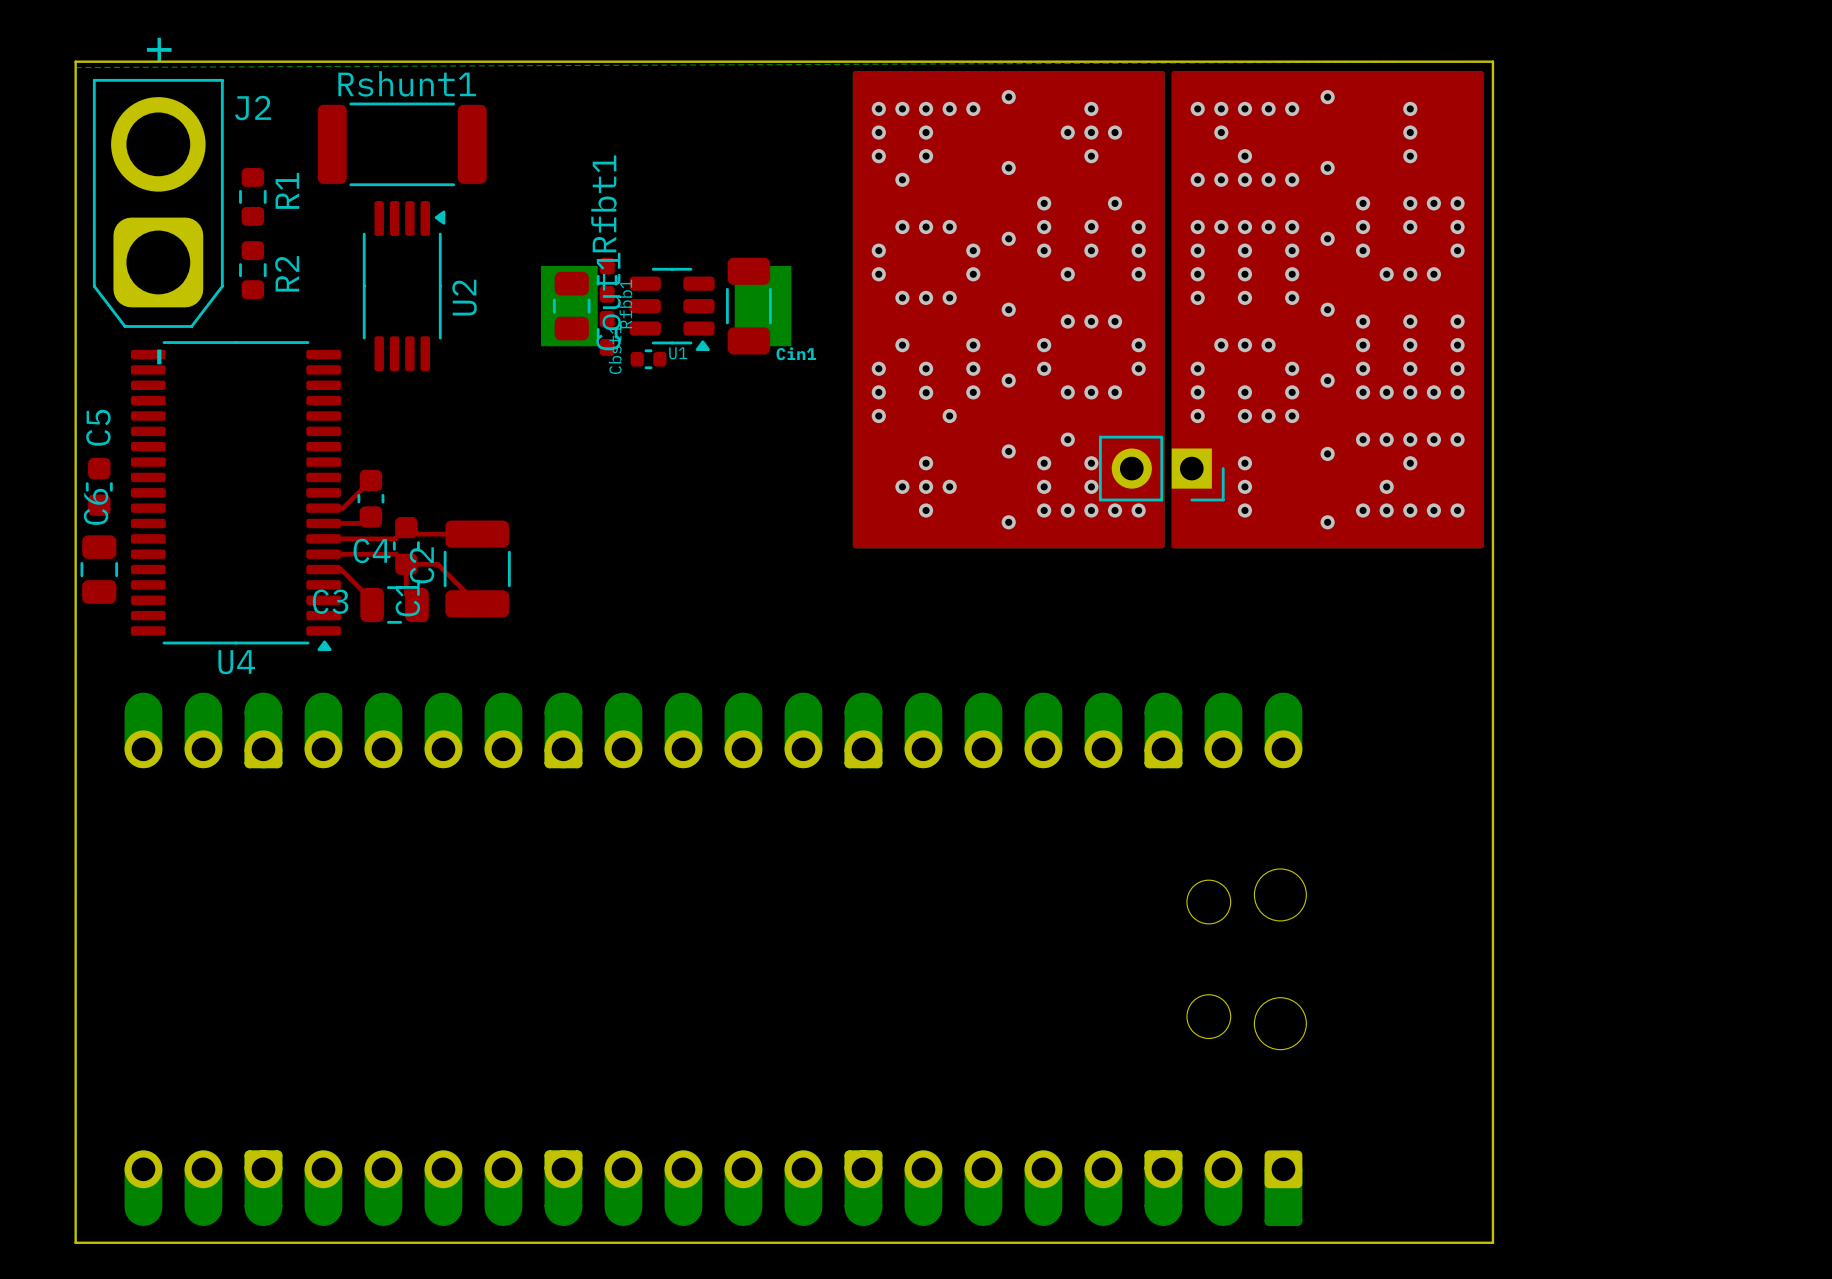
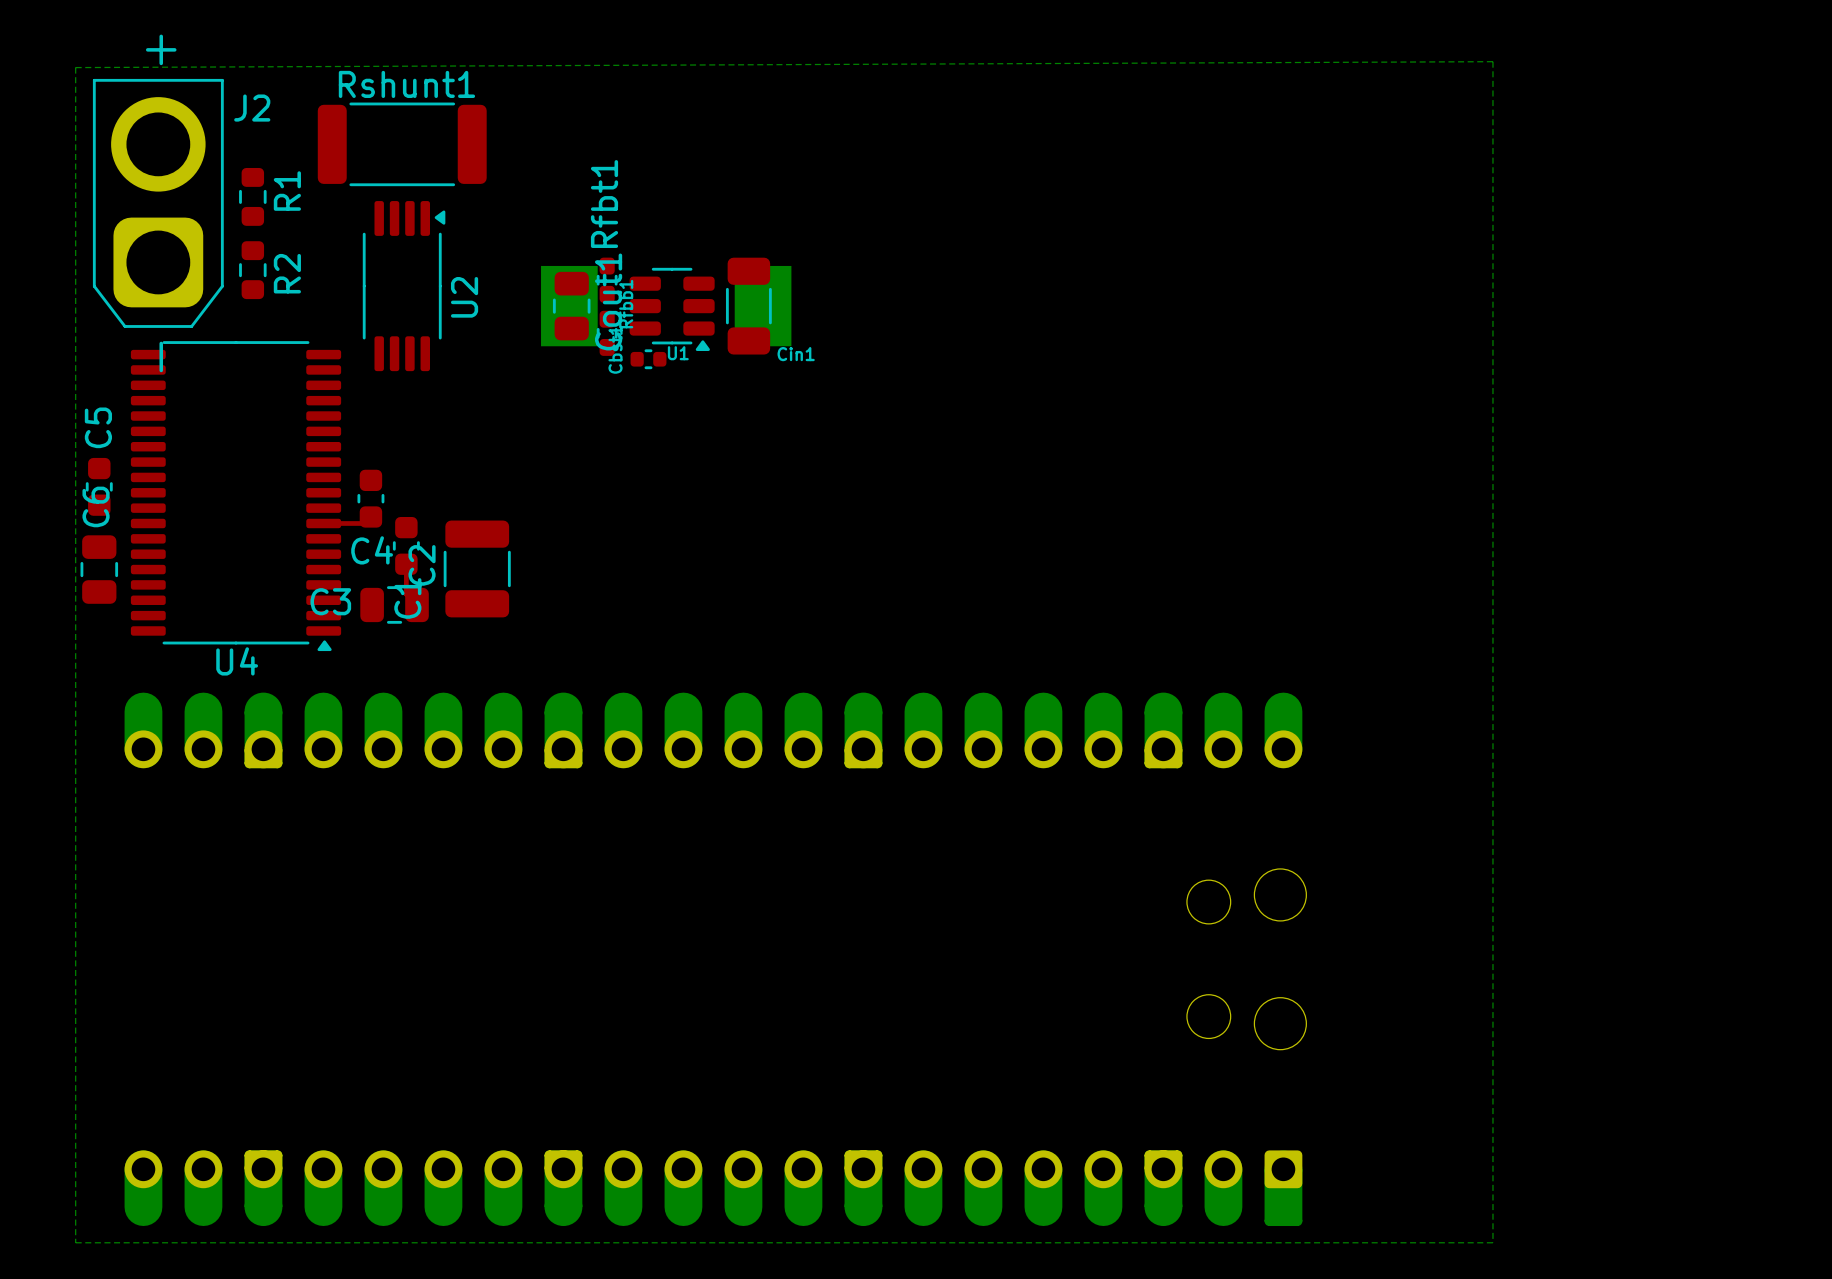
board edge: (75, 61) (1492, 61) (1492, 1242) (75, 1242) (75, 61) -> none
drawing: [852, 71, 1484, 549] -> none
via: (1008, 97) -> none
via: (1327, 97) -> none
via: (878, 108) -> none
via: (902, 108) -> none
via: (926, 108) -> none
via: (949, 108) -> none
via: (973, 108) -> none
via: (1091, 108) -> none
via: (1197, 108) -> none
via: (1221, 108) -> none
via: (1244, 108) -> none
via: (1268, 108) -> none
via: (1292, 108) -> none
via: (1410, 108) -> none
via: (878, 132) -> none
via: (926, 132) -> none
via: (1067, 132) -> none
via: (1091, 132) -> none
via: (1115, 132) -> none
via: (1221, 132) -> none
via: (1410, 132) -> none
via: (878, 156) -> none
via: (926, 156) -> none
via: (1091, 156) -> none
via: (1244, 156) -> none
via: (1410, 156) -> none
via: (1008, 167) -> none
via: (1327, 167) -> none
via: (902, 179) -> none
via: (1197, 179) -> none
via: (1221, 179) -> none
via: (1244, 179) -> none
via: (1268, 179) -> none
via: (1292, 179) -> none
via: (1044, 203) -> none
via: (1115, 203) -> none
via: (1363, 203) -> none
via: (1410, 203) -> none
via: (1433, 203) -> none
via: (1457, 203) -> none
via: (1091, 226) -> none
via: (902, 227) -> none
via: (926, 227) -> none
via: (949, 227) -> none
via: (1044, 227) -> none
via: (1138, 227) -> none
via: (1197, 227) -> none
via: (1221, 227) -> none
via: (1244, 227) -> none
via: (1268, 227) -> none
via: (1292, 227) -> none
via: (1363, 227) -> none
via: (1410, 227) -> none
via: (1457, 227) -> none
via: (1008, 238) -> none
via: (1327, 238) -> none
via: (878, 250) -> none
via: (973, 250) -> none
via: (1044, 250) -> none
via: (1091, 250) -> none
via: (1138, 250) -> none
via: (1197, 250) -> none
via: (1244, 250) -> none
via: (1292, 250) -> none
via: (1363, 250) -> none
via: (1457, 250) -> none
via: (878, 274) -> none
via: (973, 274) -> none
via: (1067, 274) -> none
via: (1138, 274) -> none
via: (1197, 274) -> none
via: (1244, 274) -> none
via: (1292, 274) -> none
via: (1386, 274) -> none
via: (1410, 274) -> none
via: (1433, 274) -> none
via: (902, 297) -> none
via: (926, 297) -> none
via: (949, 297) -> none
via: (1197, 297) -> none
via: (1244, 297) -> none
via: (1292, 297) -> none
via: (1008, 309) -> none
via: (1327, 309) -> none
via: (1067, 321) -> none
via: (1091, 321) -> none
via: (1115, 321) -> none
via: (1363, 321) -> none
via: (1410, 321) -> none
via: (1457, 321) -> none
via: (902, 345) -> none
via: (973, 345) -> none
via: (1044, 345) -> none
via: (1138, 345) -> none
via: (1221, 345) -> none
via: (1244, 345) -> none
via: (1268, 345) -> none
via: (1363, 345) -> none
via: (1410, 345) -> none
via: (1457, 345) -> none
via: (878, 368) -> none
via: (926, 368) -> none
via: (973, 368) -> none
via: (1044, 368) -> none
via: (1138, 368) -> none
via: (1197, 368) -> none
via: (1292, 368) -> none
via: (1363, 368) -> none
via: (1410, 368) -> none
via: (1457, 368) -> none
via: (1008, 380) -> none
via: (1327, 380) -> none
via: (878, 392) -> none
via: (926, 392) -> none
via: (973, 392) -> none
via: (1067, 392) -> none
via: (1091, 392) -> none
via: (1115, 392) -> none
via: (1197, 392) -> none
via: (1244, 392) -> none
via: (1292, 392) -> none
via: (1363, 392) -> none
via: (1386, 392) -> none
via: (1410, 392) -> none
via: (1433, 392) -> none
via: (1457, 392) -> none
via: (878, 416) -> none
via: (949, 416) -> none
via: (1197, 416) -> none
via: (1244, 416) -> none
via: (1268, 416) -> none
via: (1292, 416) -> none
via: (1067, 439) -> none
via: (1363, 439) -> none
via: (1386, 439) -> none
via: (1410, 439) -> none
via: (1433, 439) -> none
via: (1457, 439) -> none
via: (1008, 451) -> none
via: (1327, 453) -> none
via: (926, 463) -> none
via: (1044, 463) -> none
via: (1091, 463) -> none
via: (1244, 463) -> none
via: (1410, 463) -> none
part: (1161, 468) -> none
top track: (370, 480) (343, 508) (323, 508) -> none
via: (902, 486) -> none
via: (926, 486) -> none
via: (949, 486) -> none
via: (1044, 486) -> none
via: (1091, 486) -> none
via: (1244, 486) -> none
via: (1386, 486) -> none
via: (926, 510) -> none
via: (1044, 510) -> none
via: (1067, 510) -> none
via: (1091, 510) -> none
via: (1115, 510) -> none
via: (1138, 510) -> none
via: (1244, 510) -> none
via: (1363, 510) -> none
via: (1386, 510) -> none
via: (1410, 510) -> none
via: (1433, 510) -> none
via: (1457, 510) -> none
via: (1008, 522) -> none
via: (1327, 522) -> none
top track: (477, 534) (418, 534) (411, 527) (406, 527) (395, 538) (323, 538) -> none
top track: (323, 554) (396, 554) (406, 564) (437, 564) (477, 603) -> none
top track: (323, 569) (341, 569) (372, 600) (372, 604) -> none

